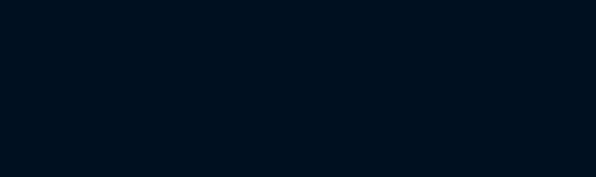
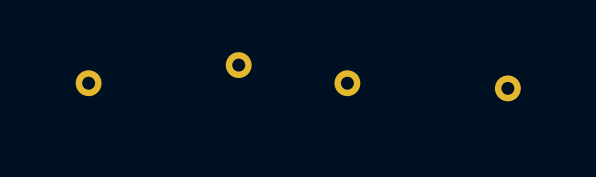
part: none -> (238, 65)
part: none -> (88, 83)
part: none -> (347, 83)
part: none -> (507, 88)

